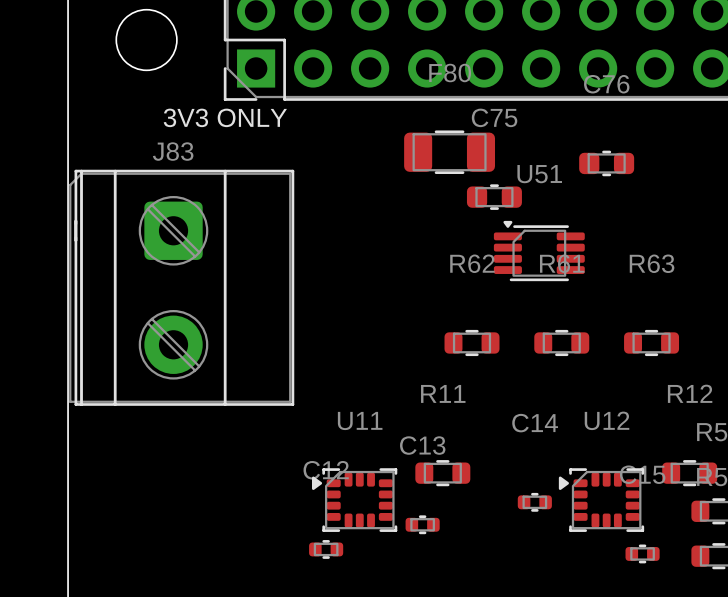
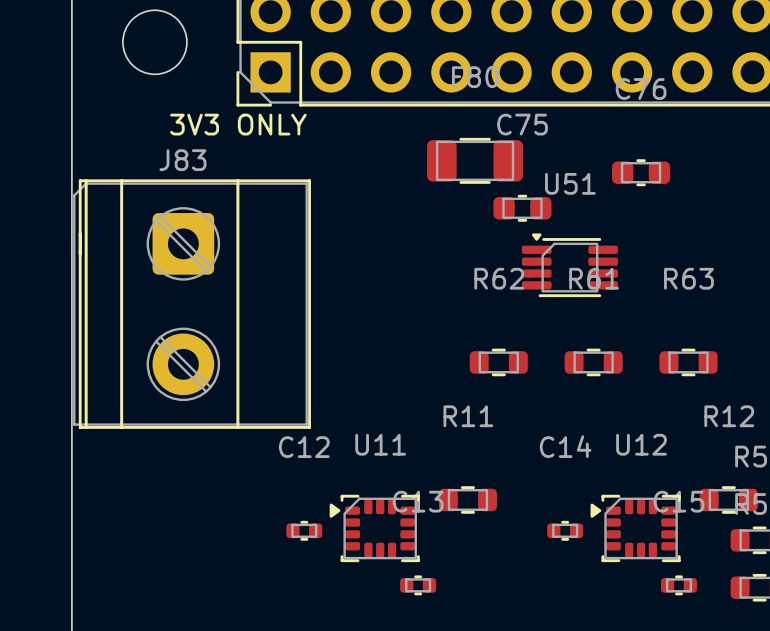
C13 position: (422, 524) -> (418, 585)
C12 position: (326, 549) -> (304, 530)

